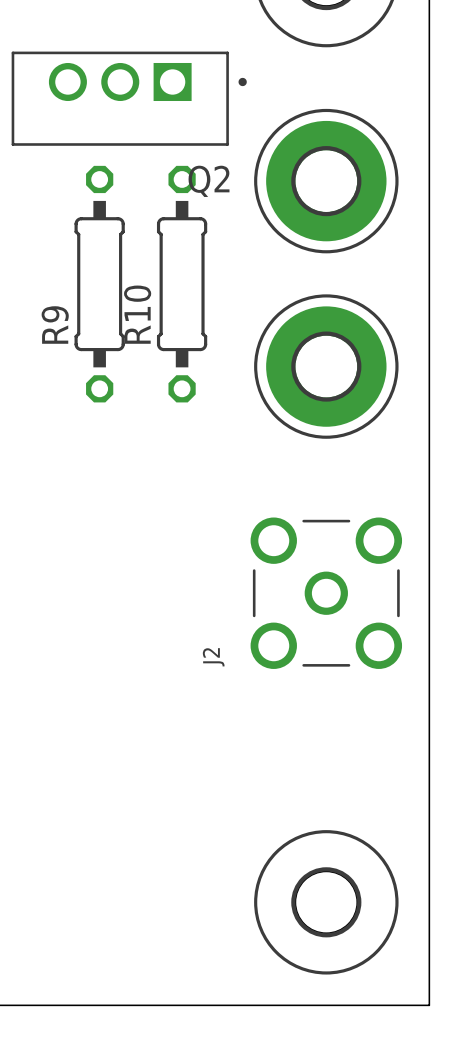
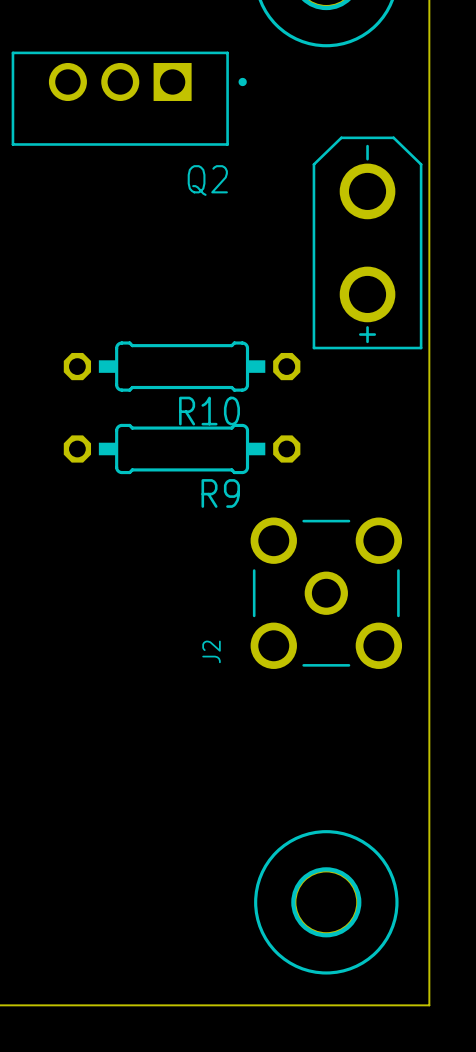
part: (326, 181) -> none
part: none -> (367, 242)
R9 rotation: 0° (99, 284) -> 90° clockwise (182, 448)
R9 position: (99, 284) -> (182, 448)
R10 rotation: 0° (182, 284) -> 90° clockwise (182, 366)
R10 name position: R10 (137, 314) -> R10 (209, 411)
R9 name position: R9 (55, 325) -> R9 (220, 493)
part: (326, 366) -> none

